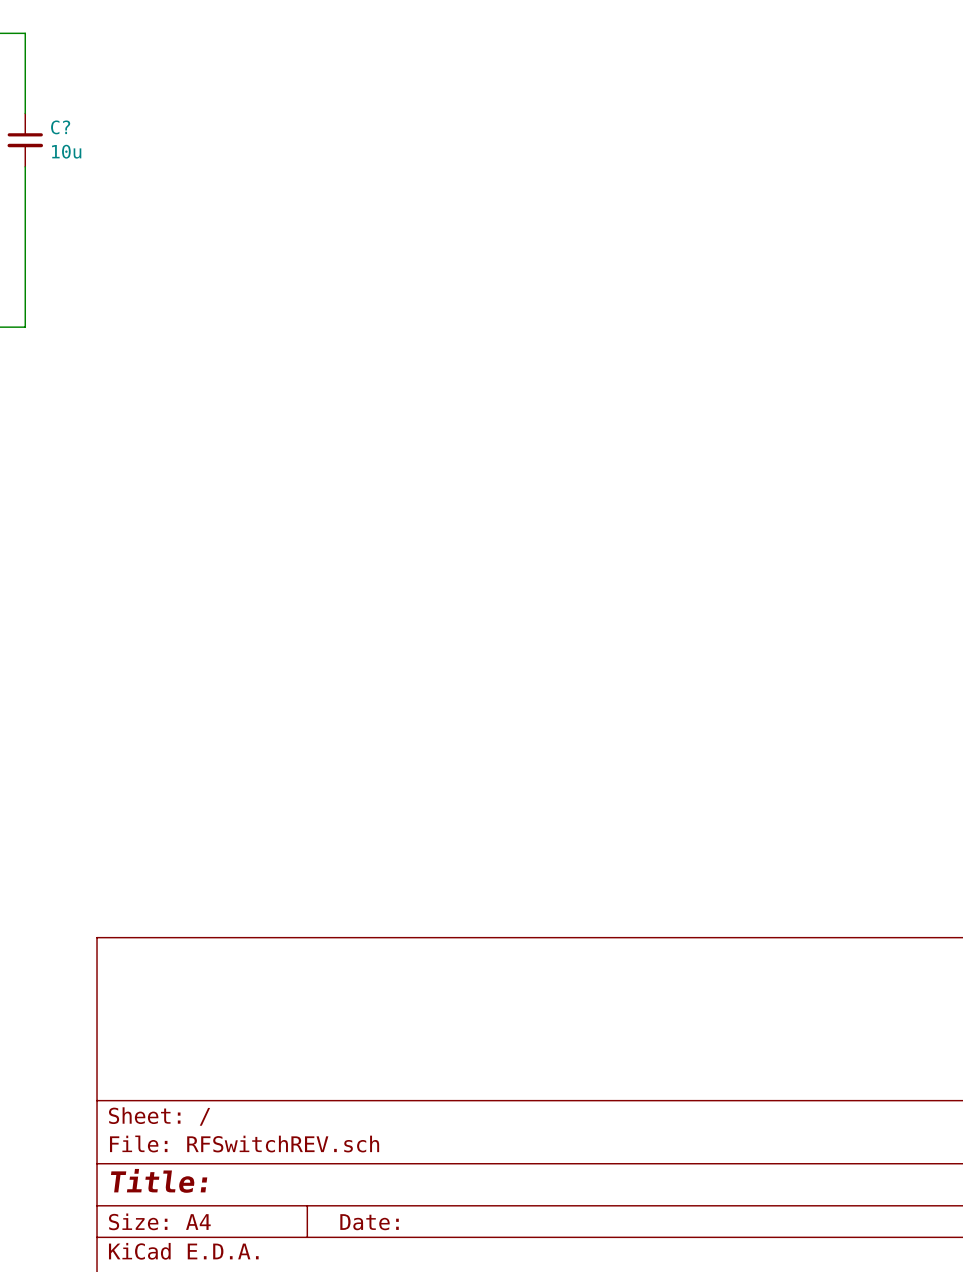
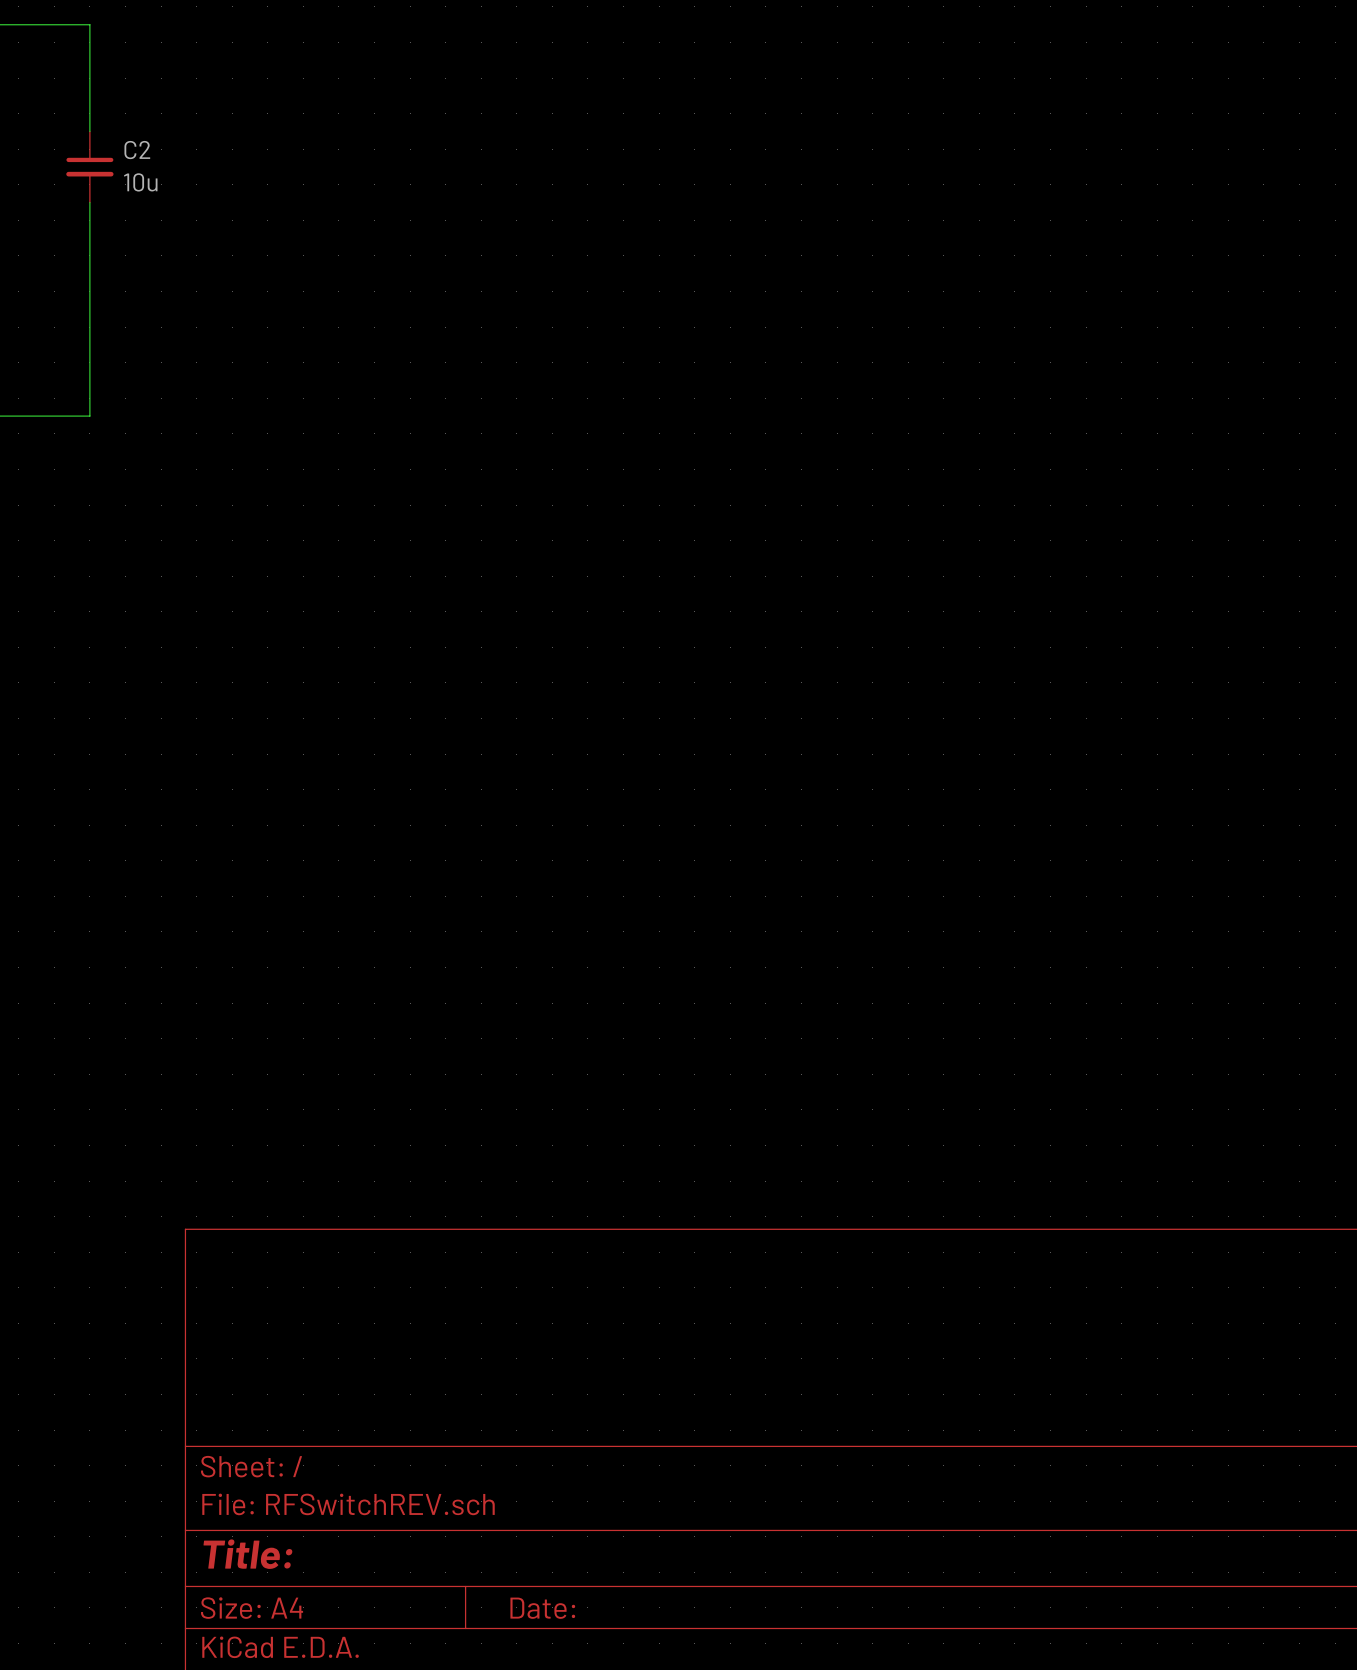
C? name: C? (60, 127) -> C2 (137, 150)

